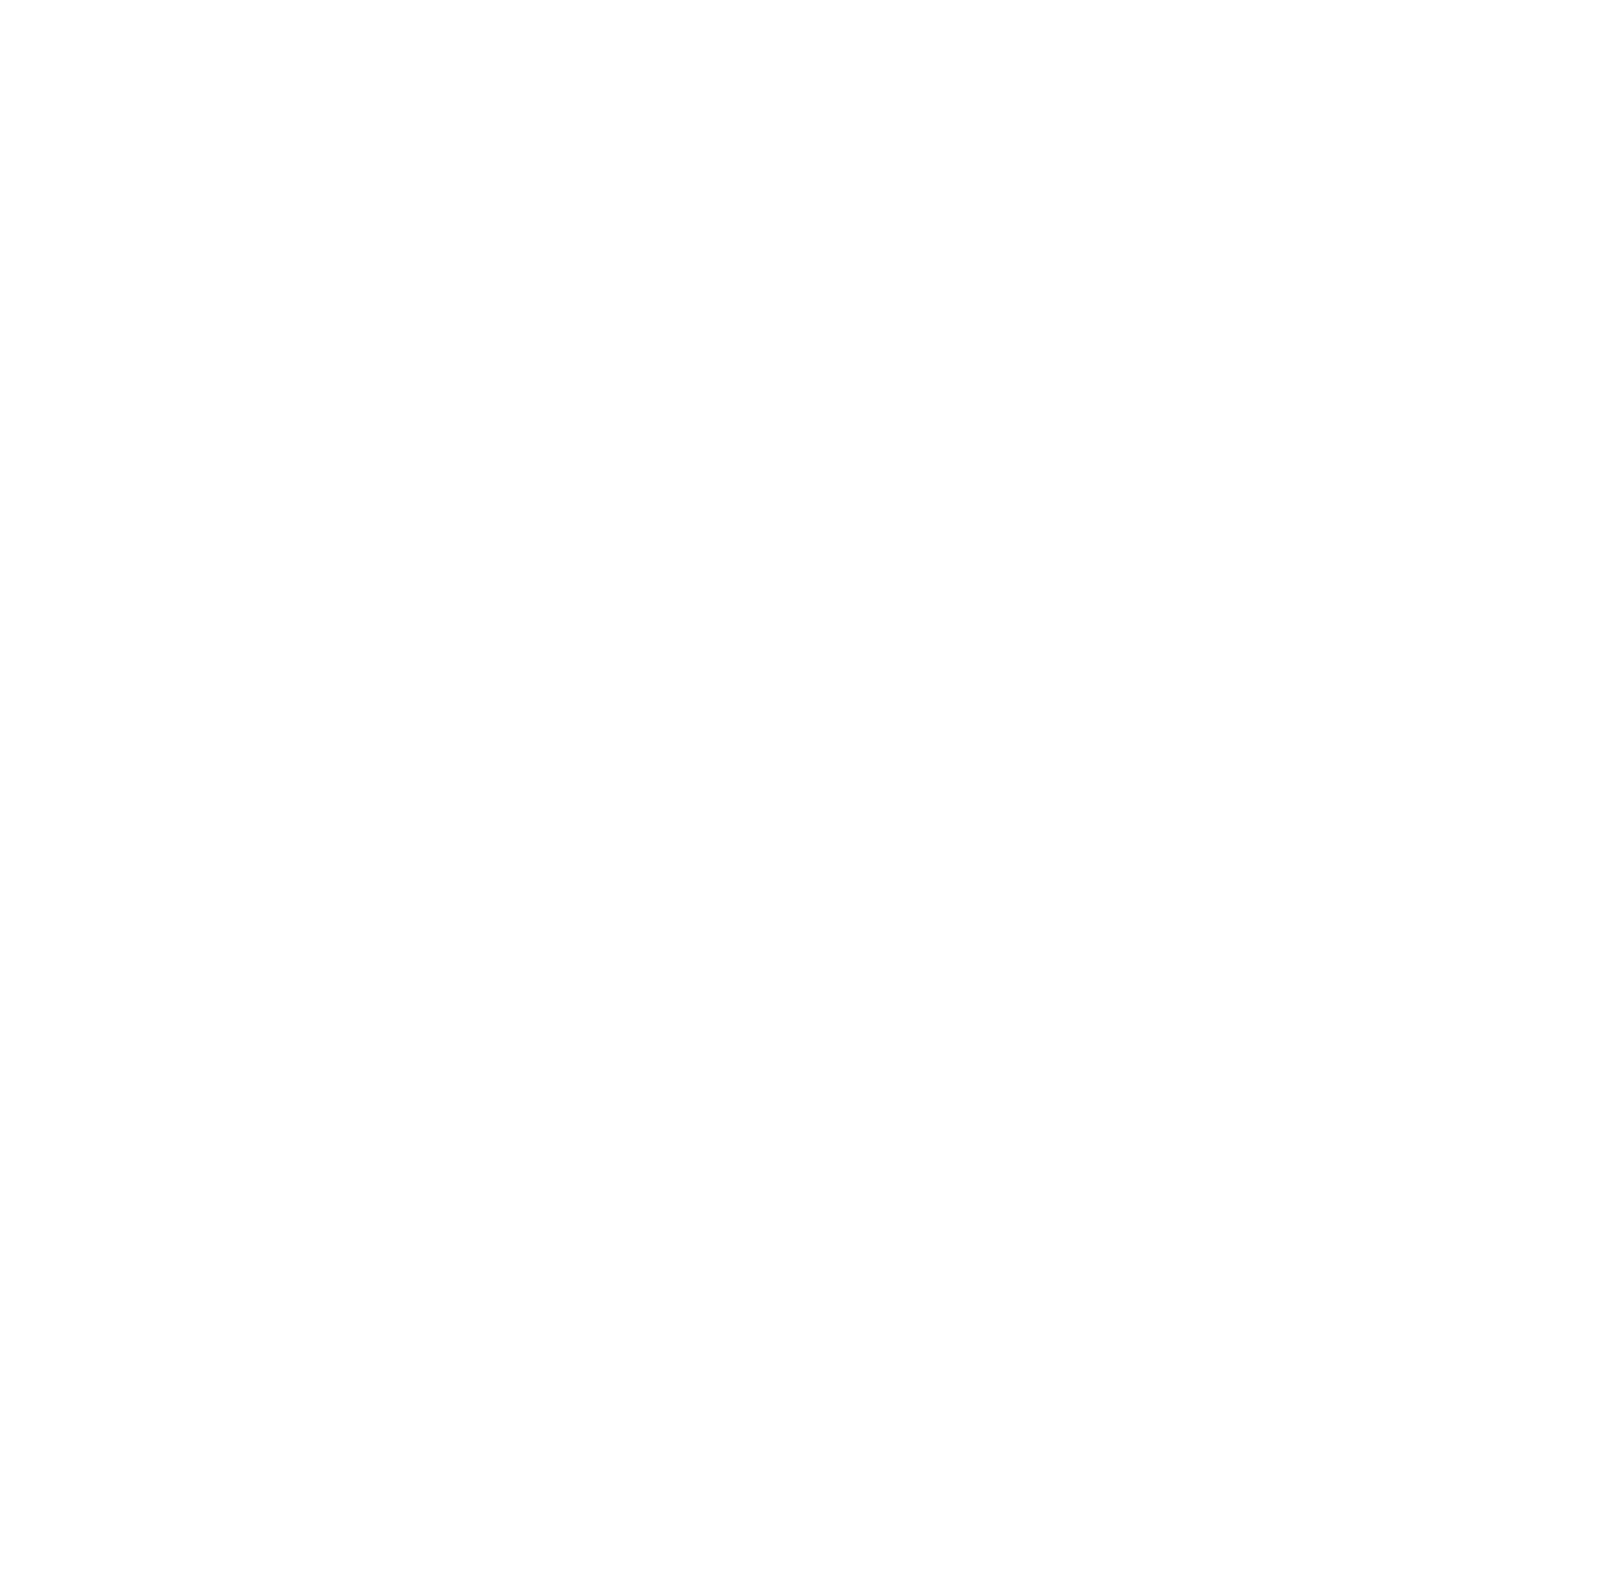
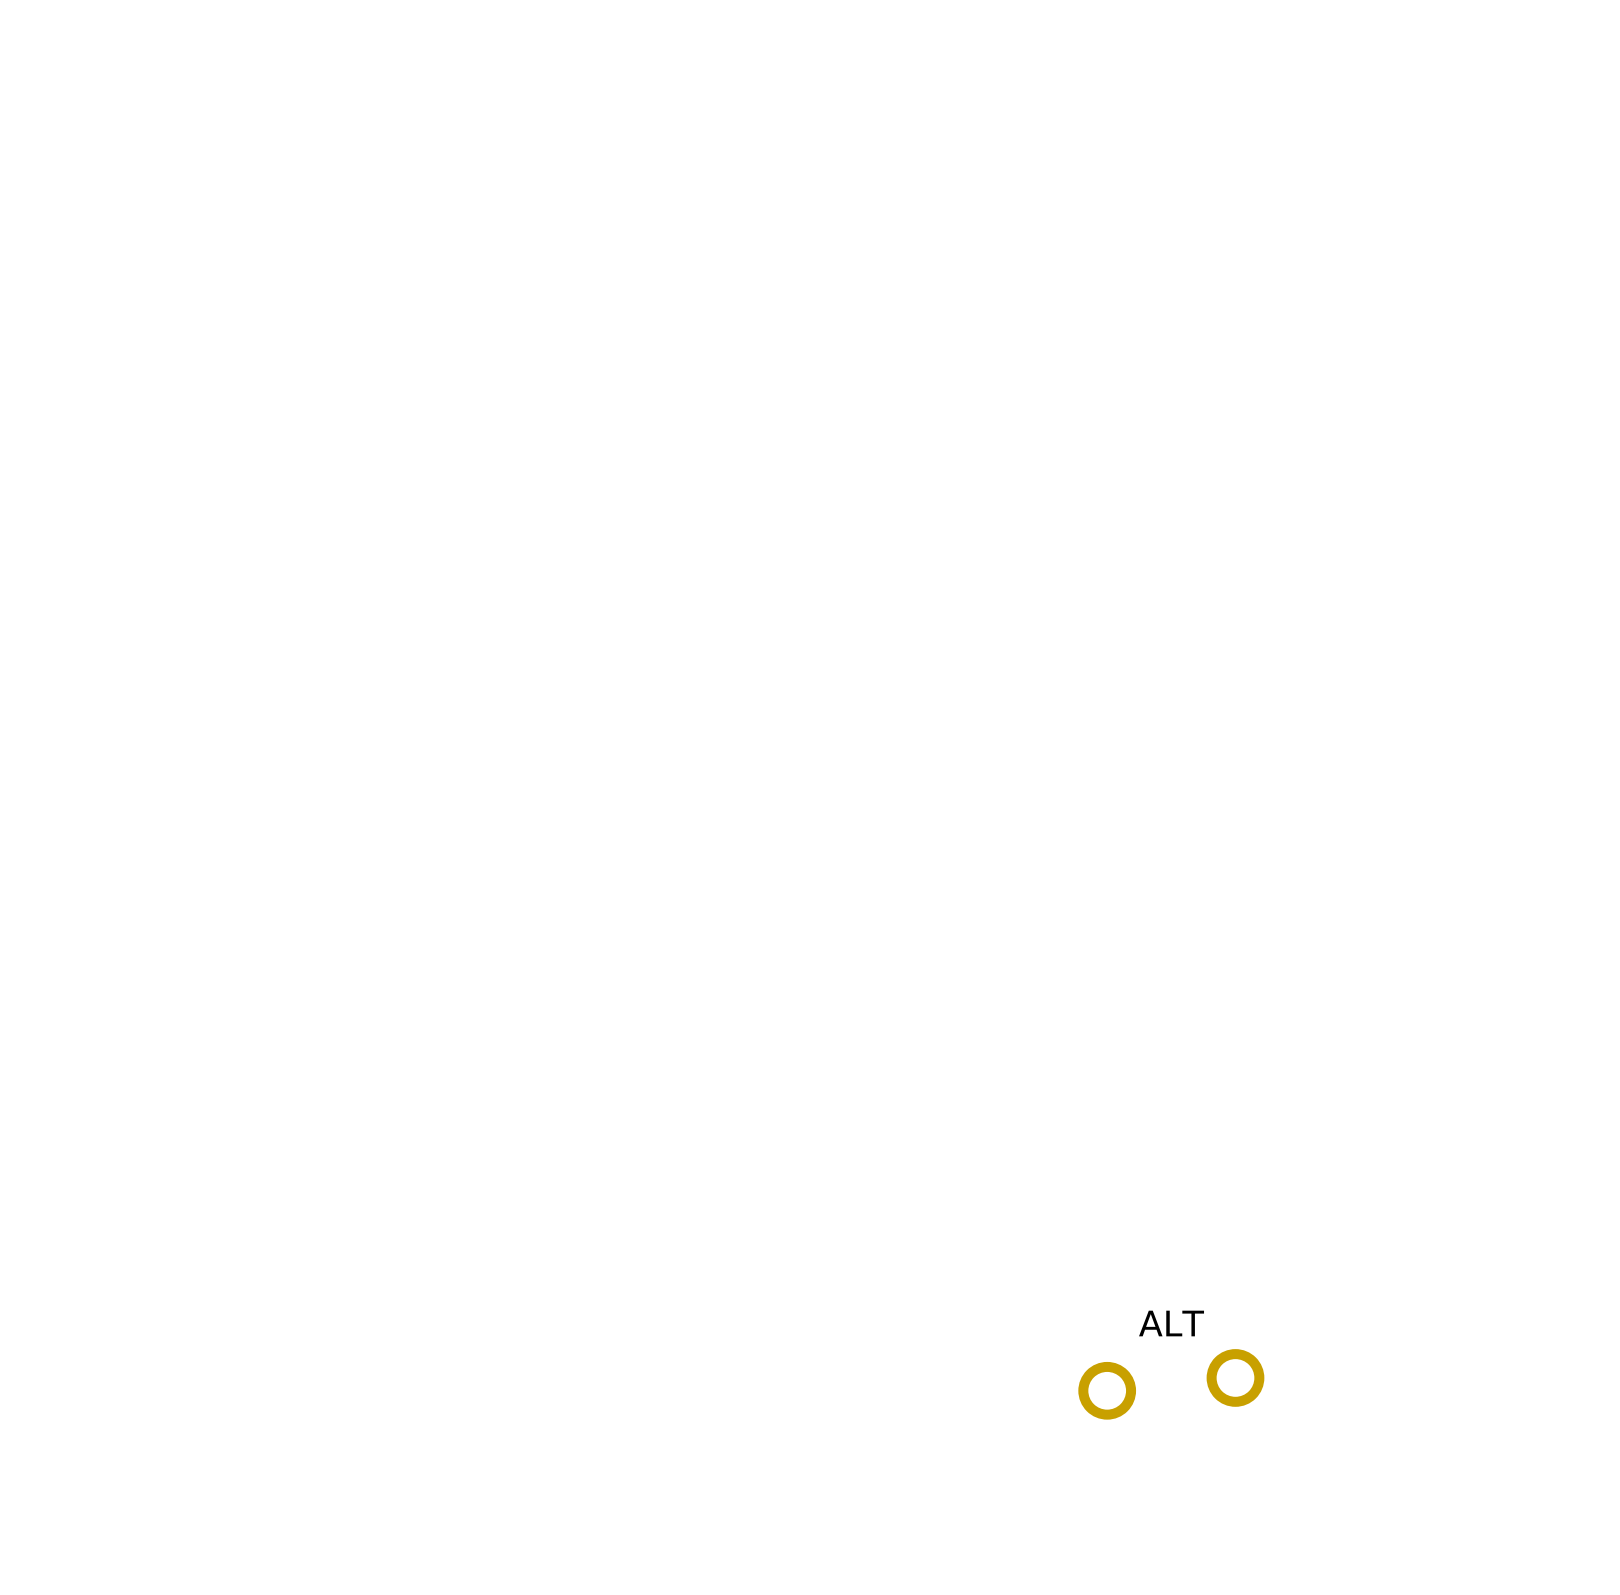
part: none -> ALT (1171, 1384)

